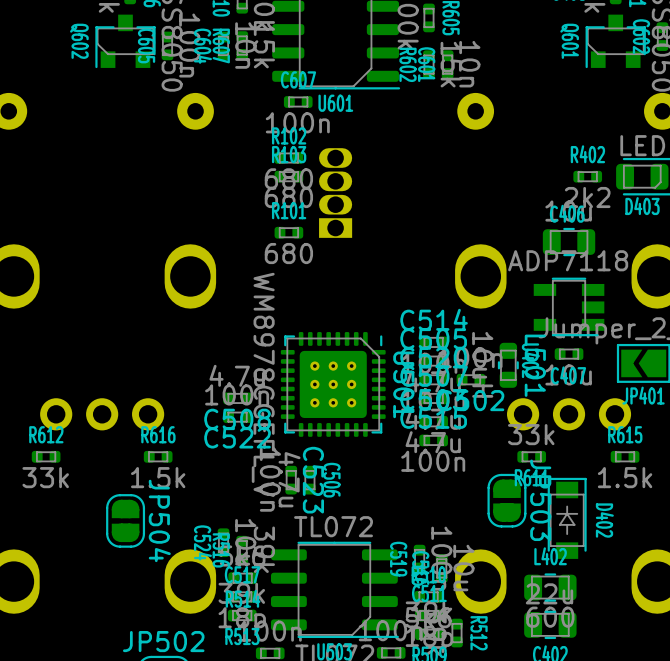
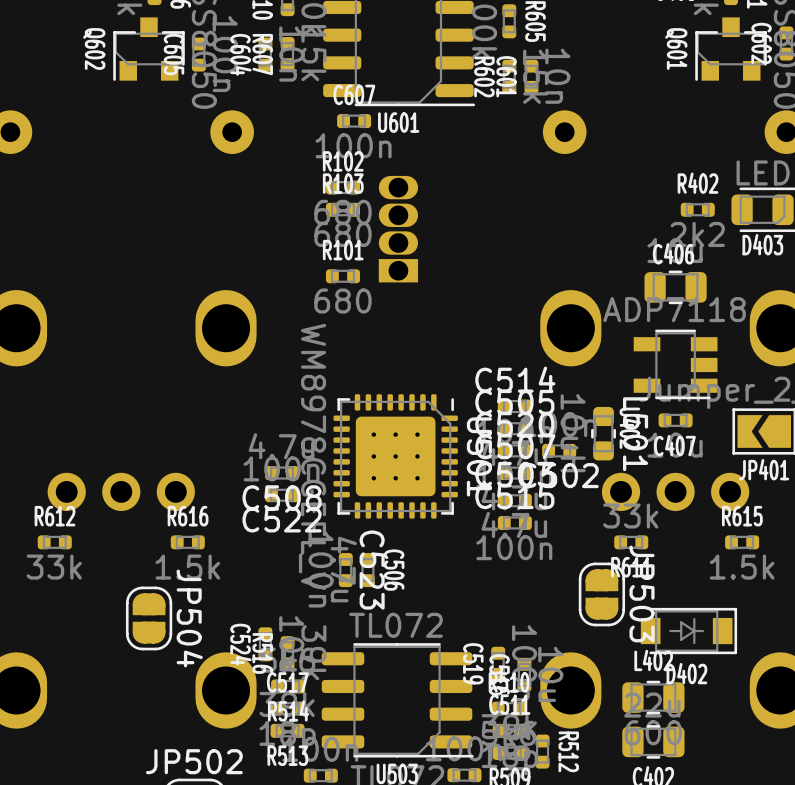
D402 rotation: 0° (567, 518) -> 90° clockwise (688, 631)

